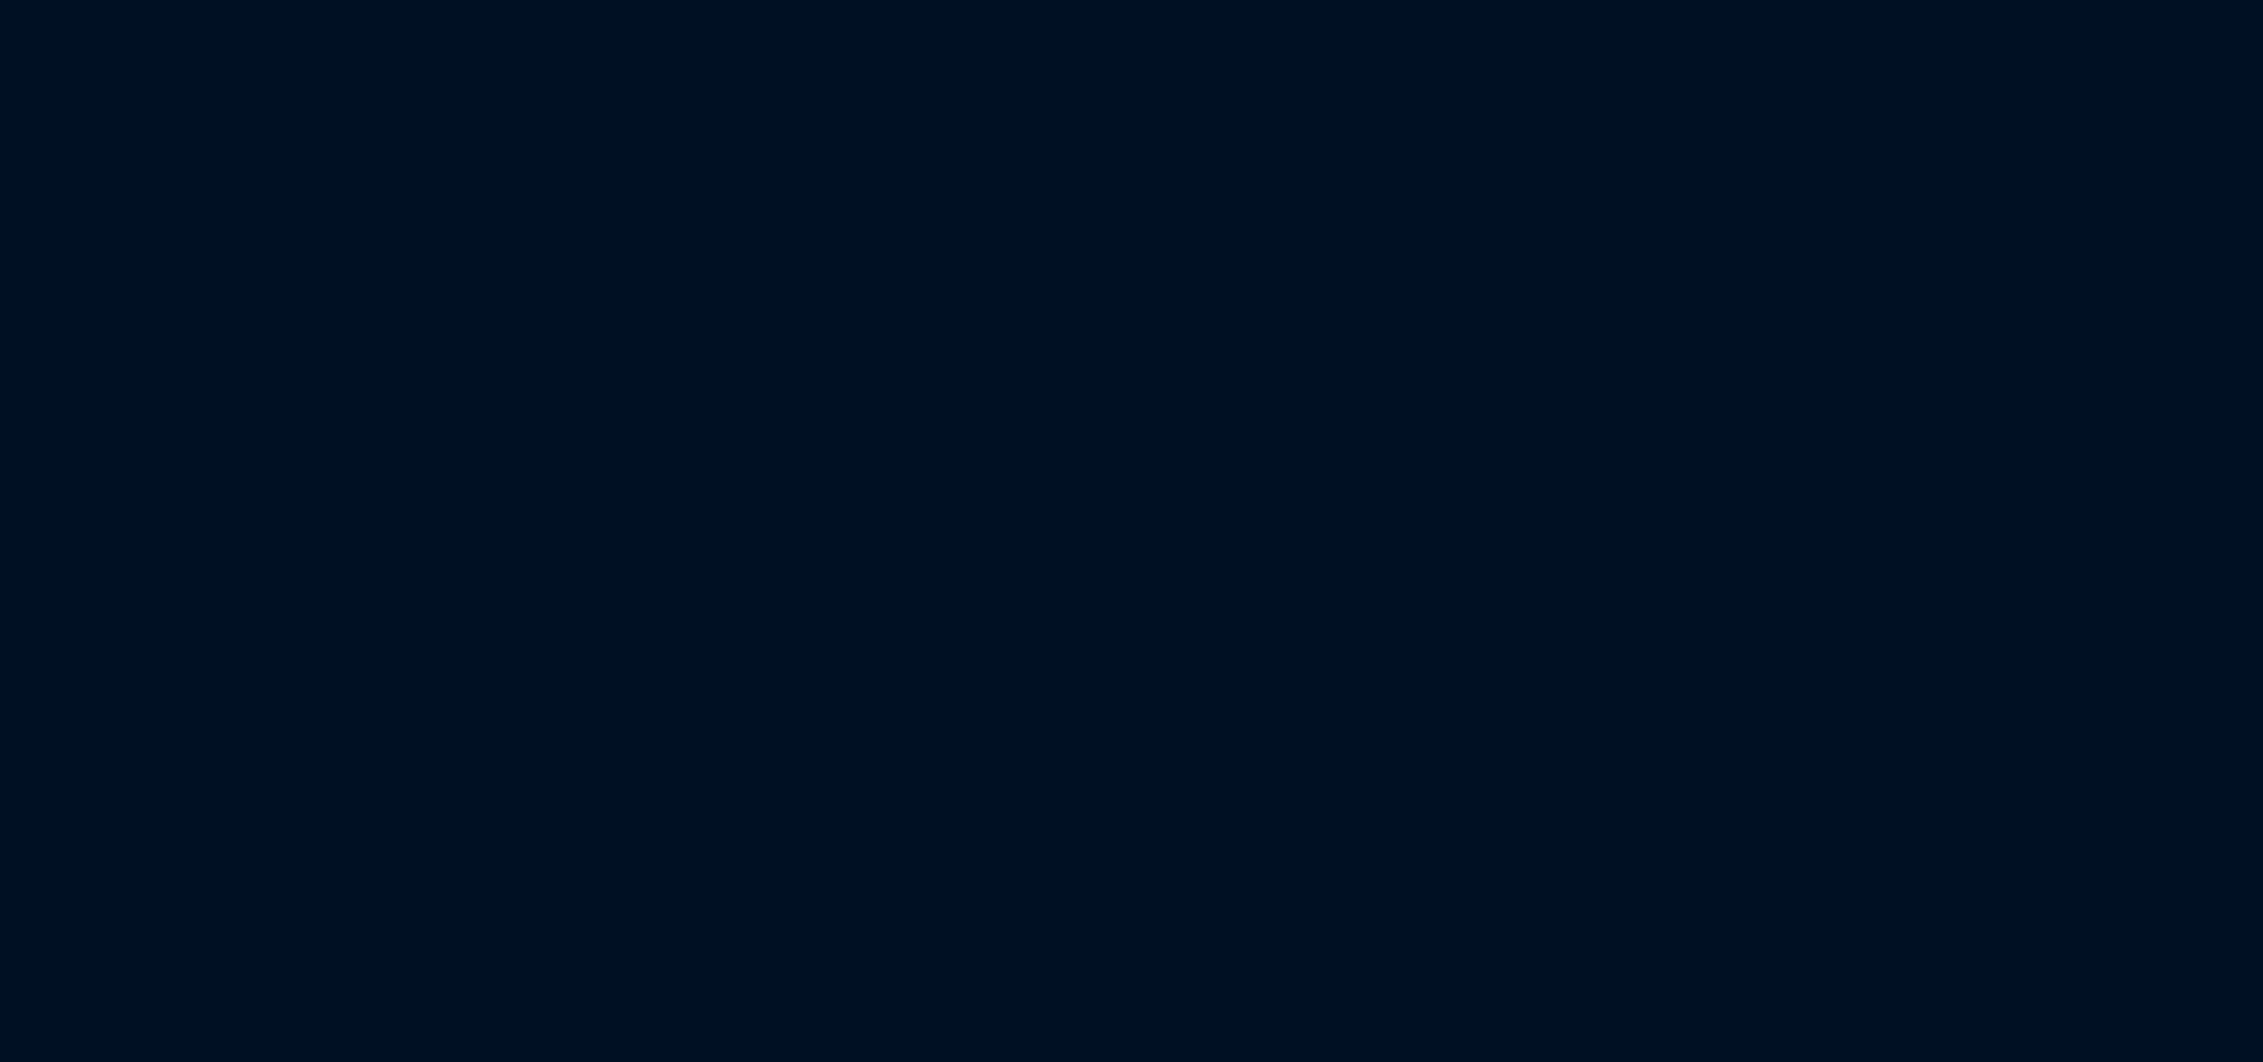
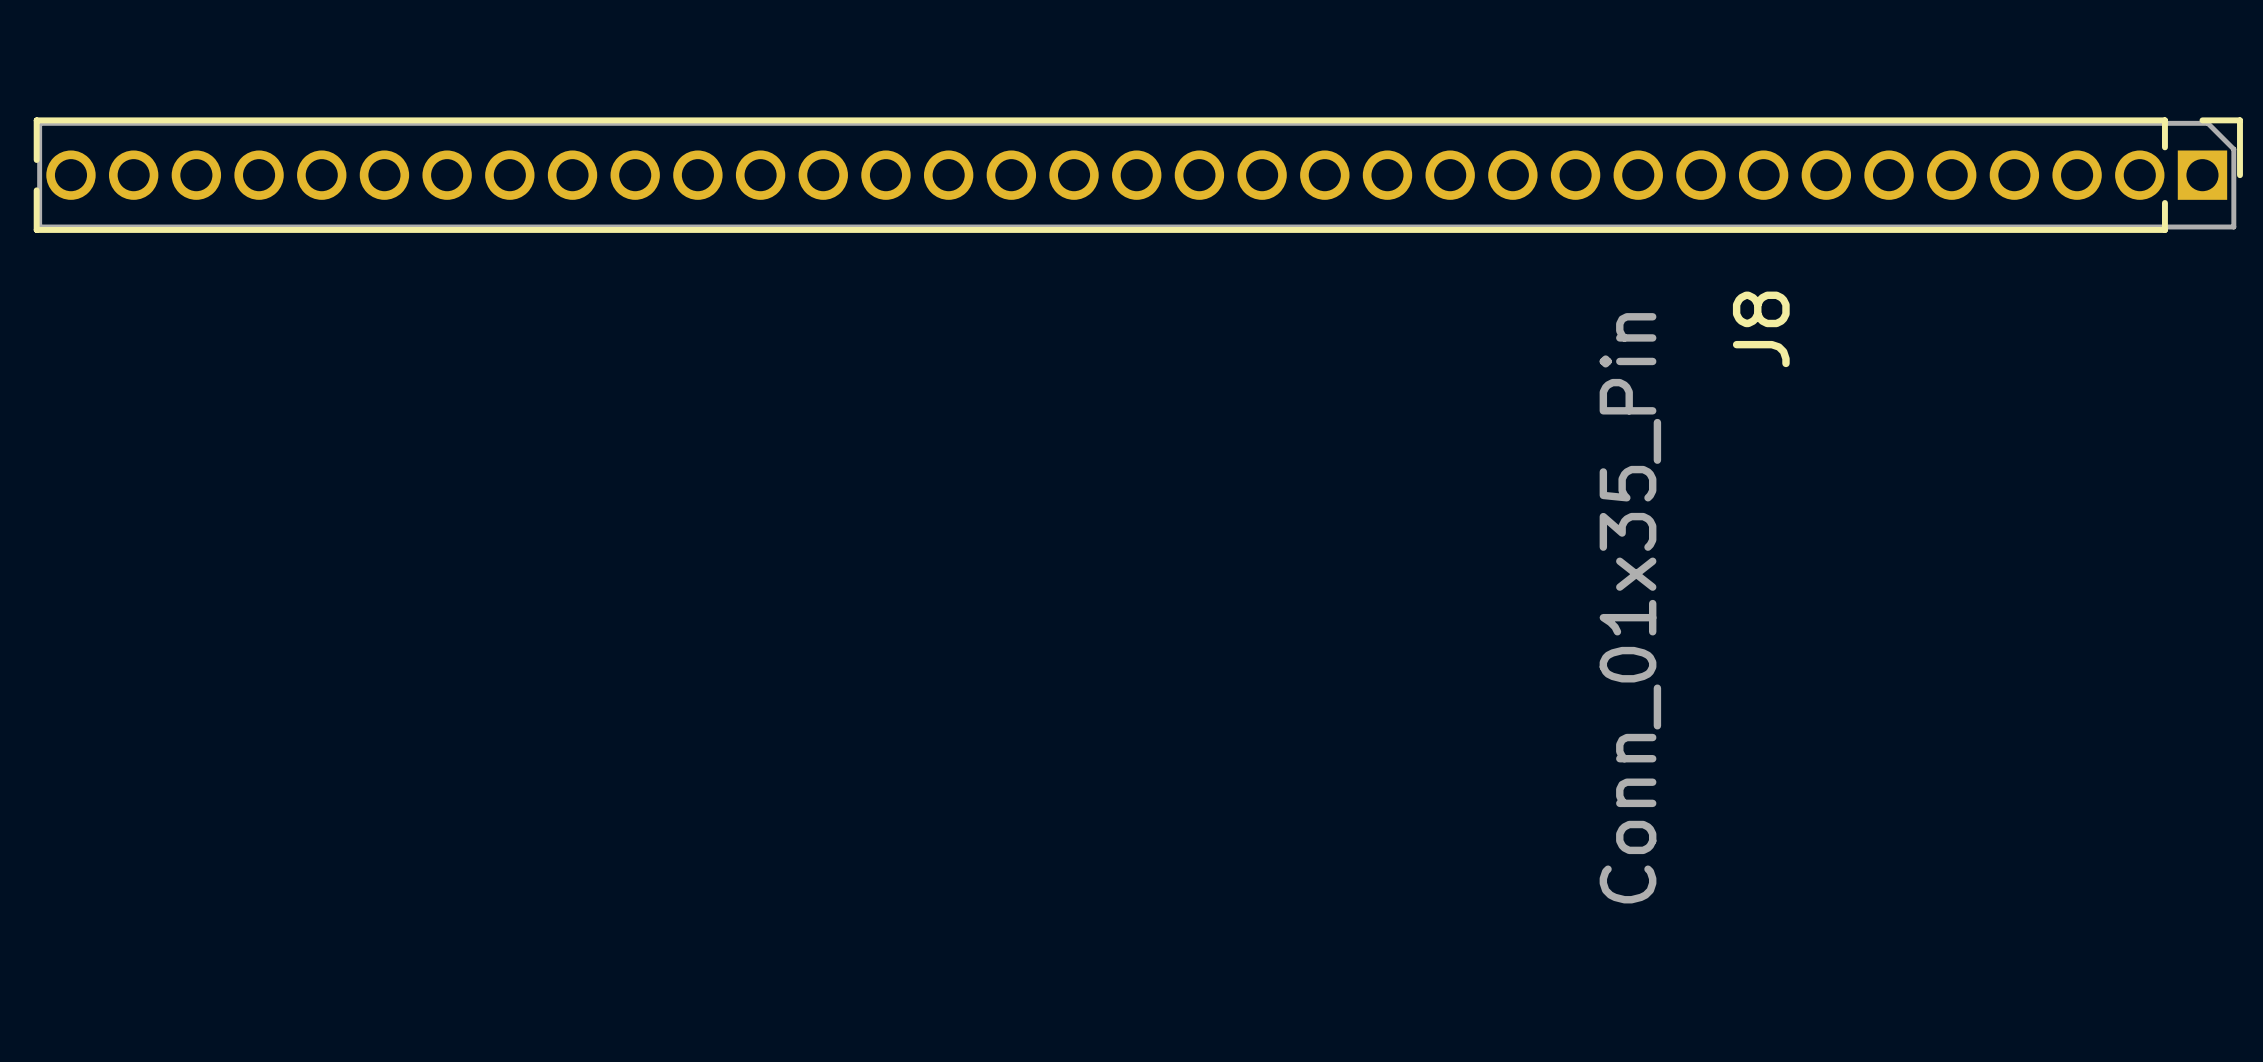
J8: none -> Conn_01x35_Pin (1138, 175)

